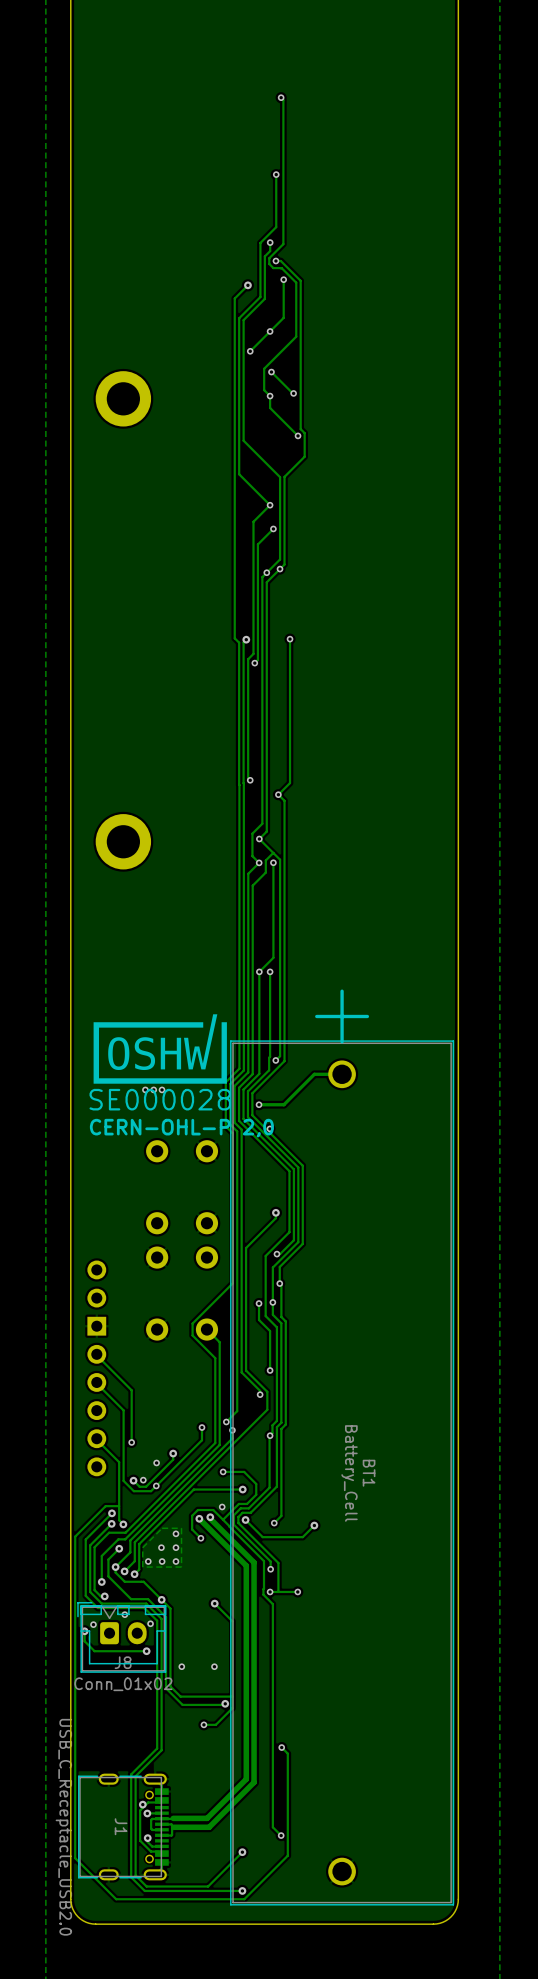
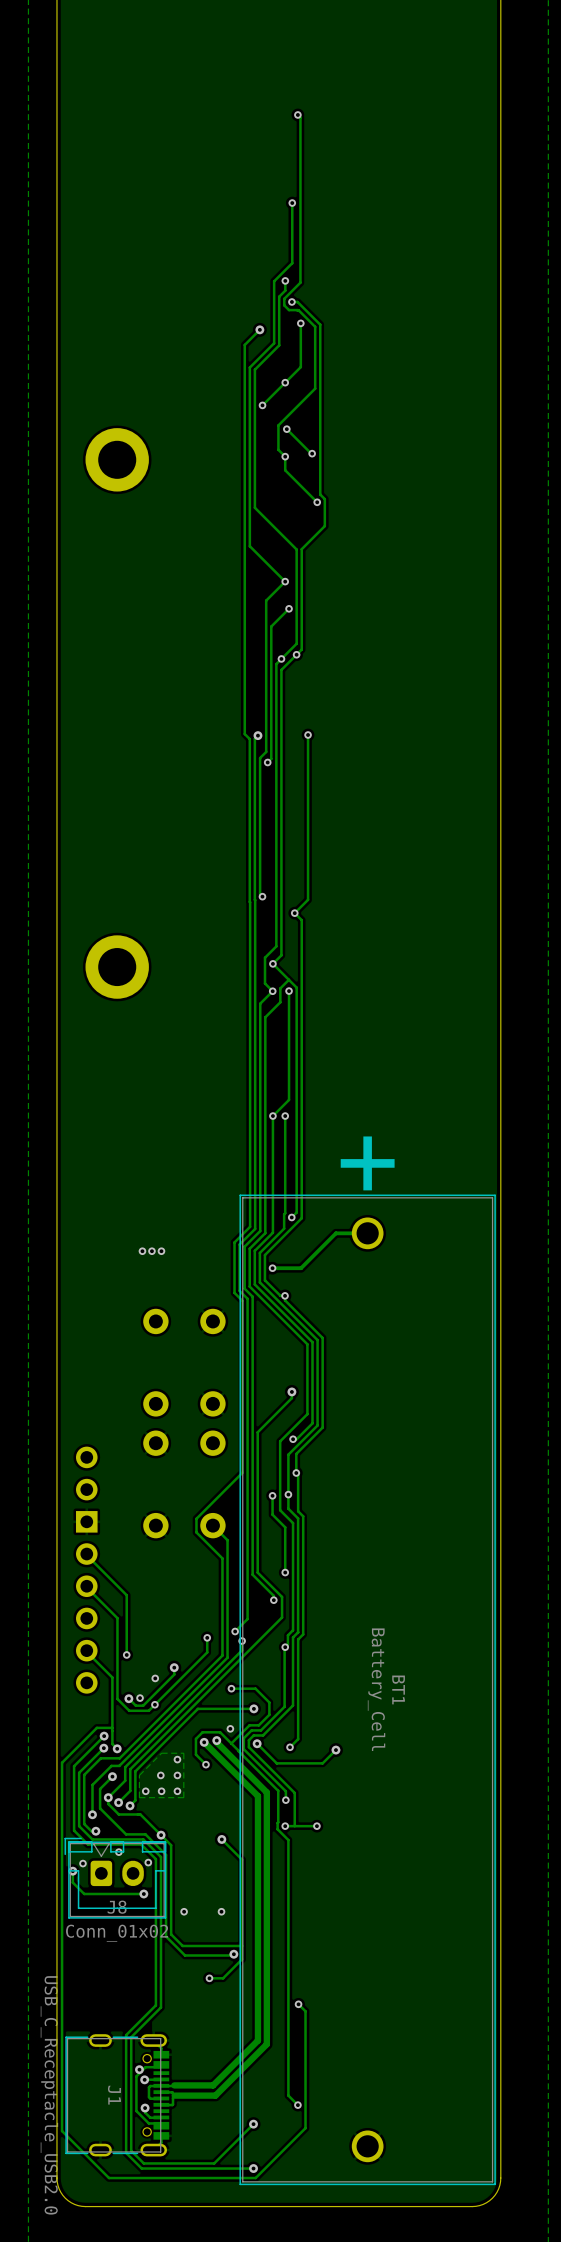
drawing: [93, 1014, 227, 1084] -> none
text: SE000028 (160, 1099) -> none
text: CERN-OHL-P 2,0 (181, 1128) -> none

